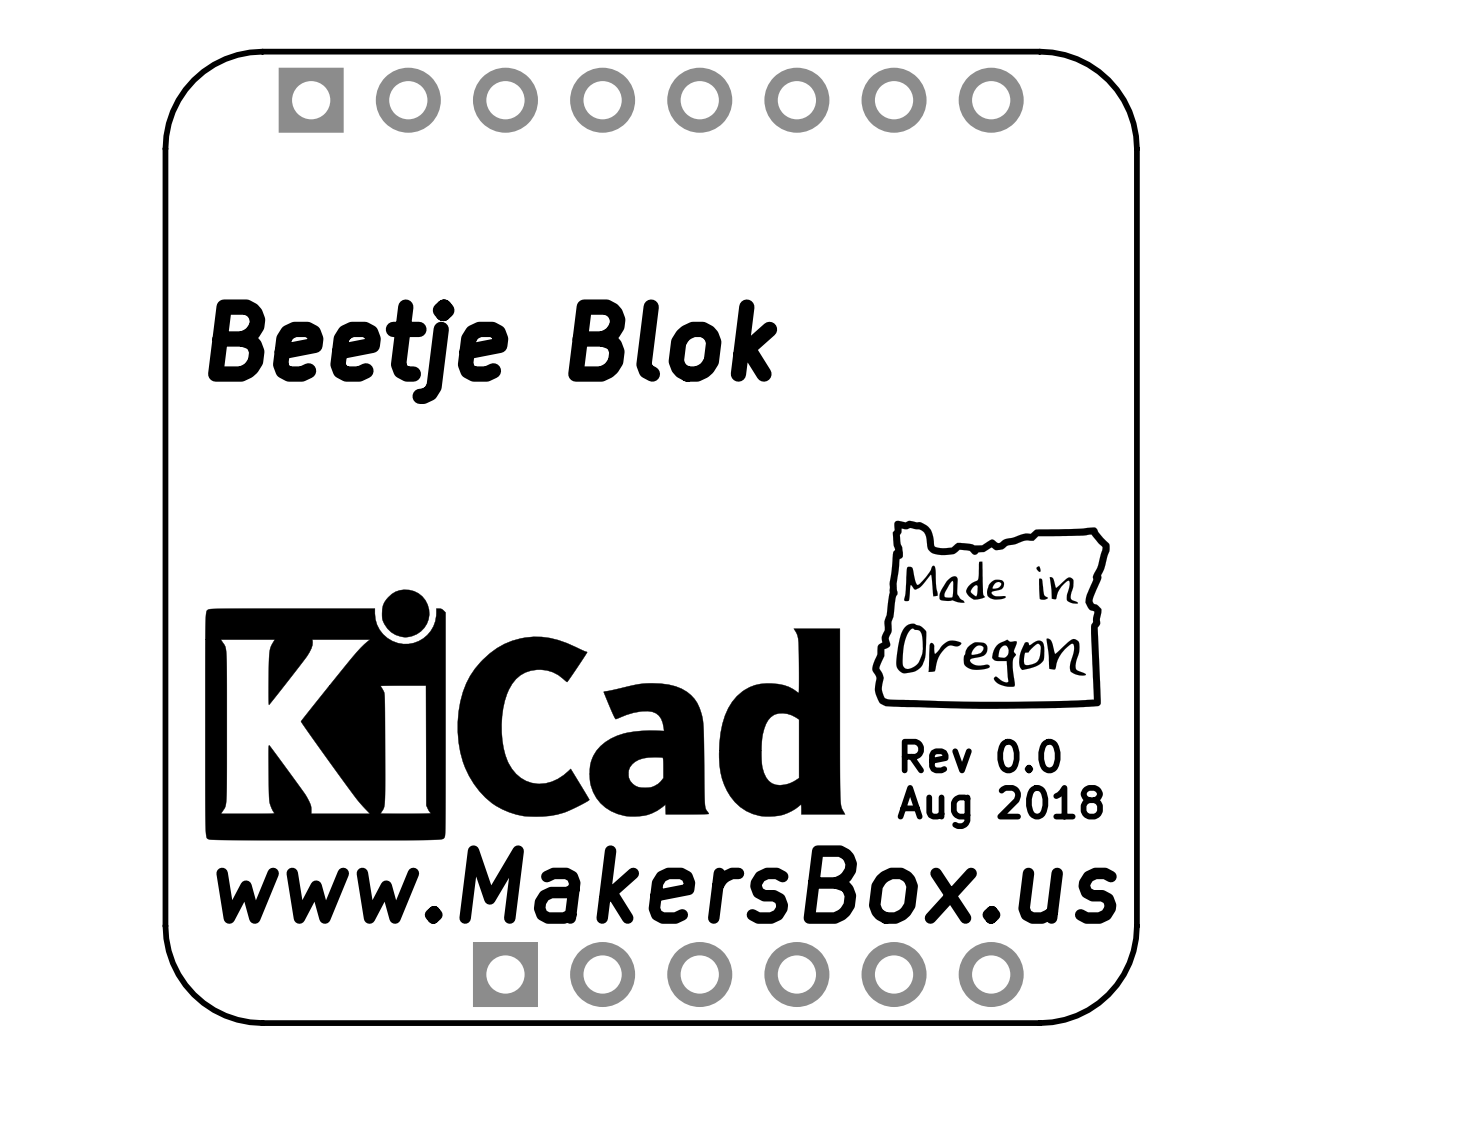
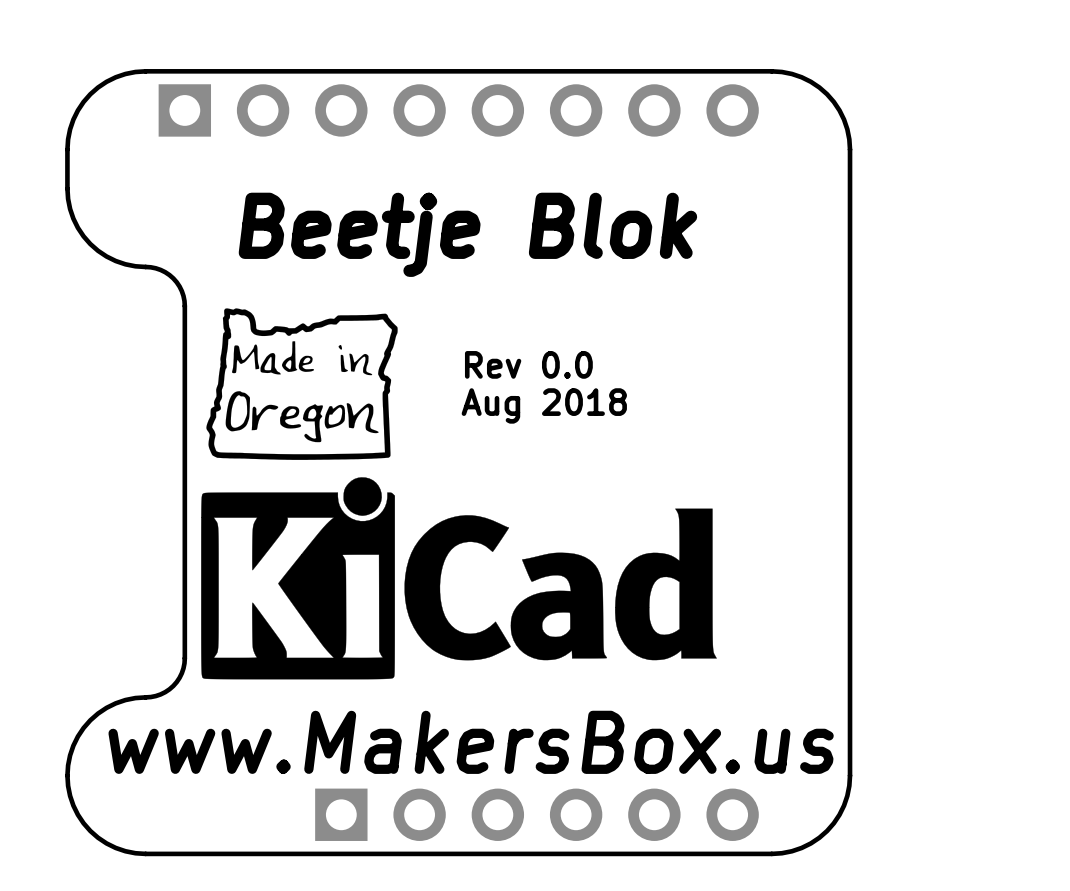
board edge: (165, 197) (165, 925) -> (67, 188) (73, 218) (90, 244) (115, 261) (135, 266) (155, 268) (165, 272) (179, 286) (184, 306) (183, 668) (176, 682) (165, 692) (155, 696) (135, 698) (115, 703) (90, 720) (73, 745) (67, 775)
text position: Beetje Blok (492, 351) -> Beetje Blok (467, 234)
drawing position: (990, 614) -> (302, 384)
drawing position: (525, 715) -> (458, 578)
text position: Rev 0.0 (981, 756) -> Rev 0.0 (528, 364)
text position: Aug 2018 (1000, 807) -> Aug 2018 (544, 405)

